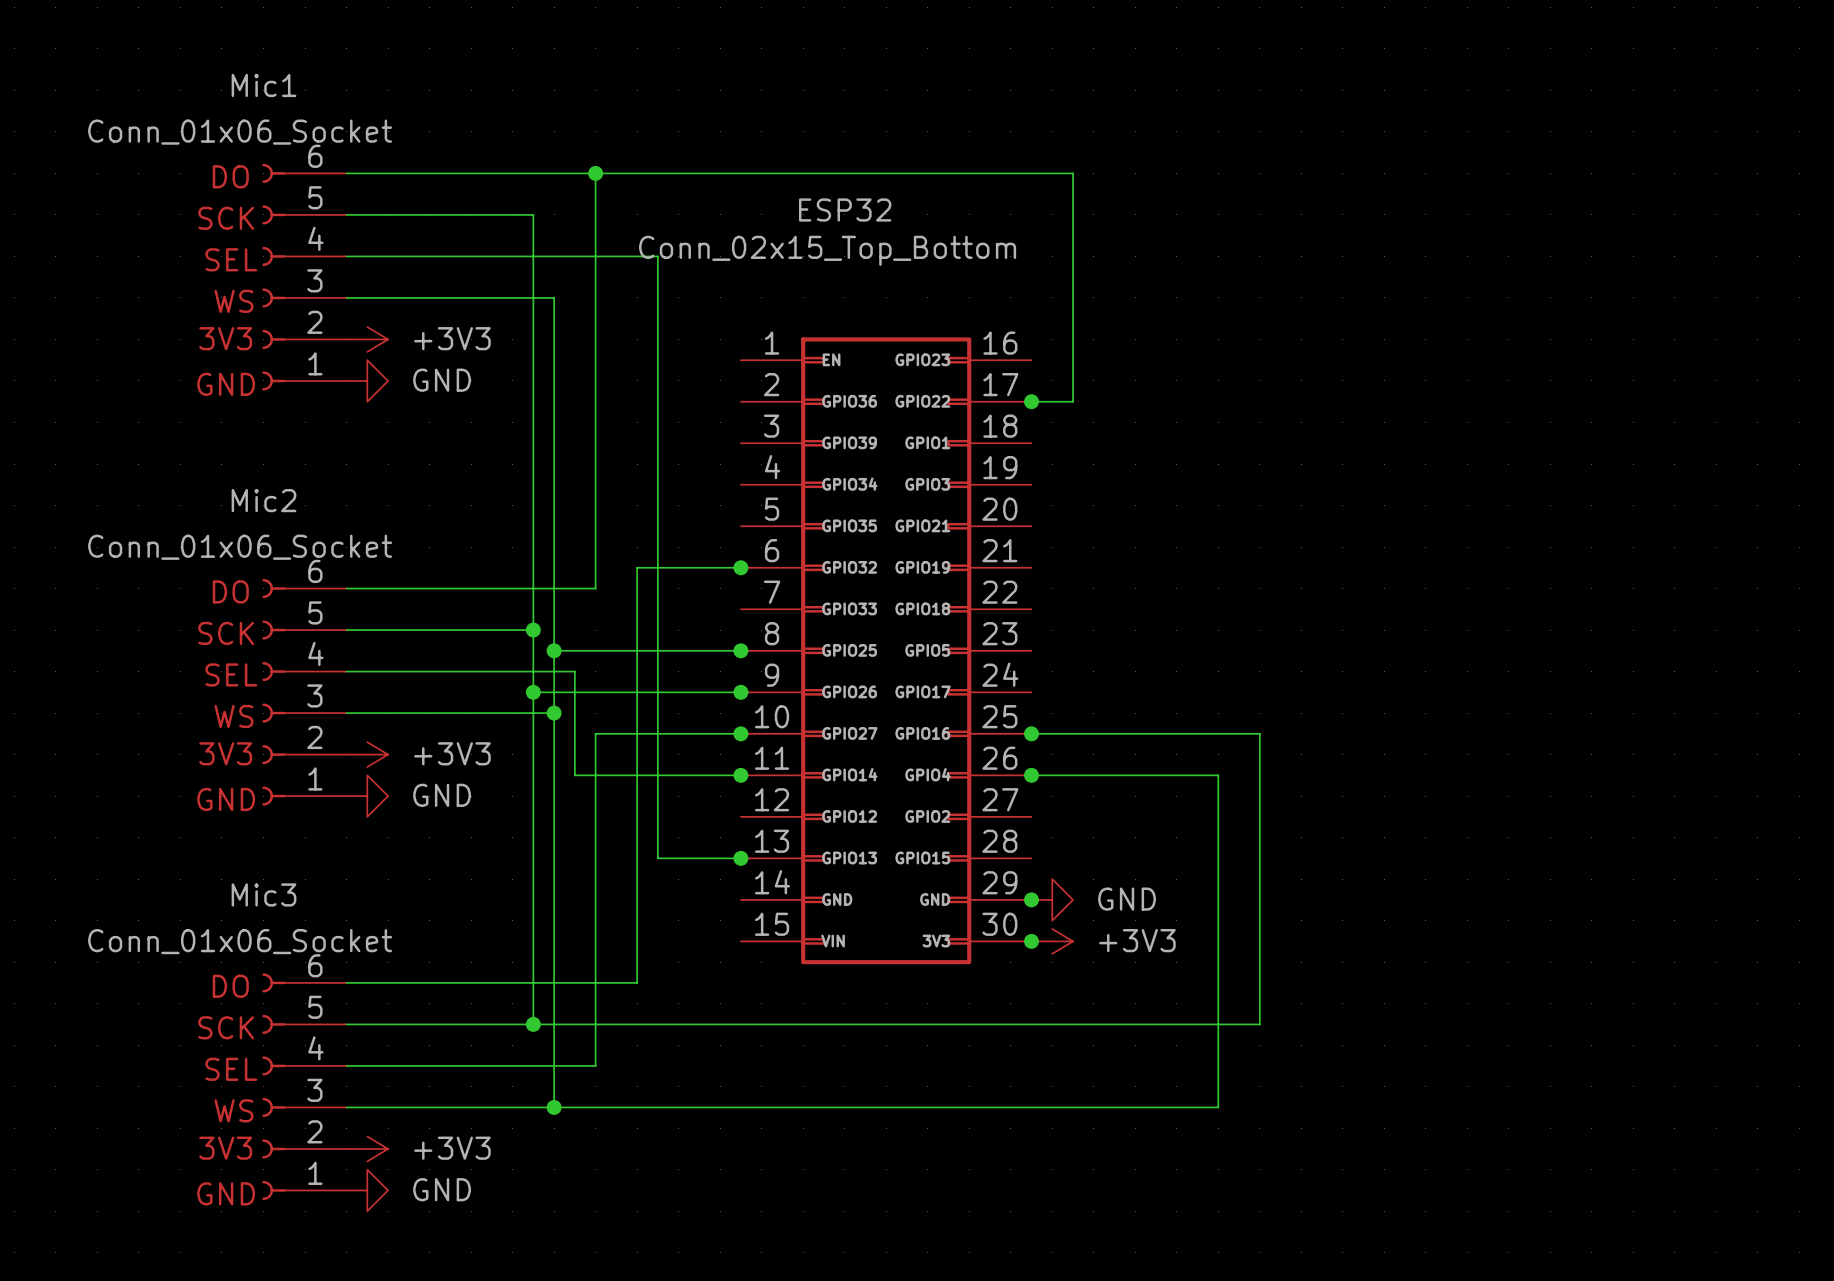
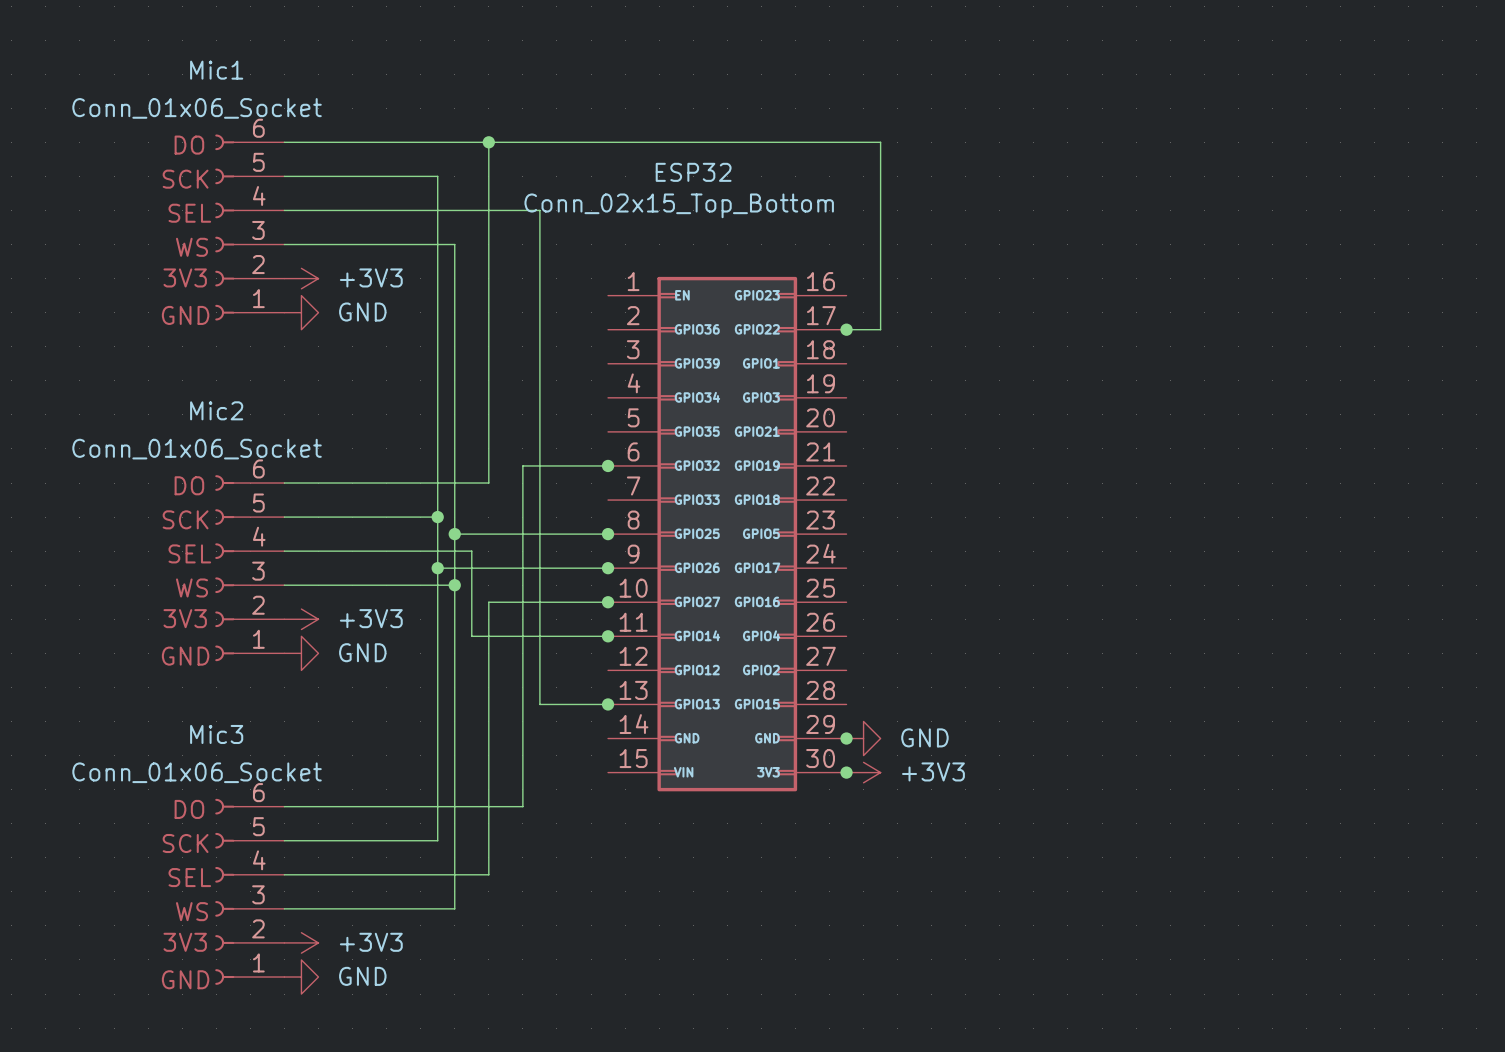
wire: (1031, 733) (1259, 733) (1259, 1024) (533, 1024) -> none
junction: (1031, 733) -> none
wire: (1031, 775) (1218, 775) (1218, 1107) (554, 1107) -> none
junction: (1031, 775) -> none
junction: (533, 1024) -> none
junction: (554, 1107) -> none

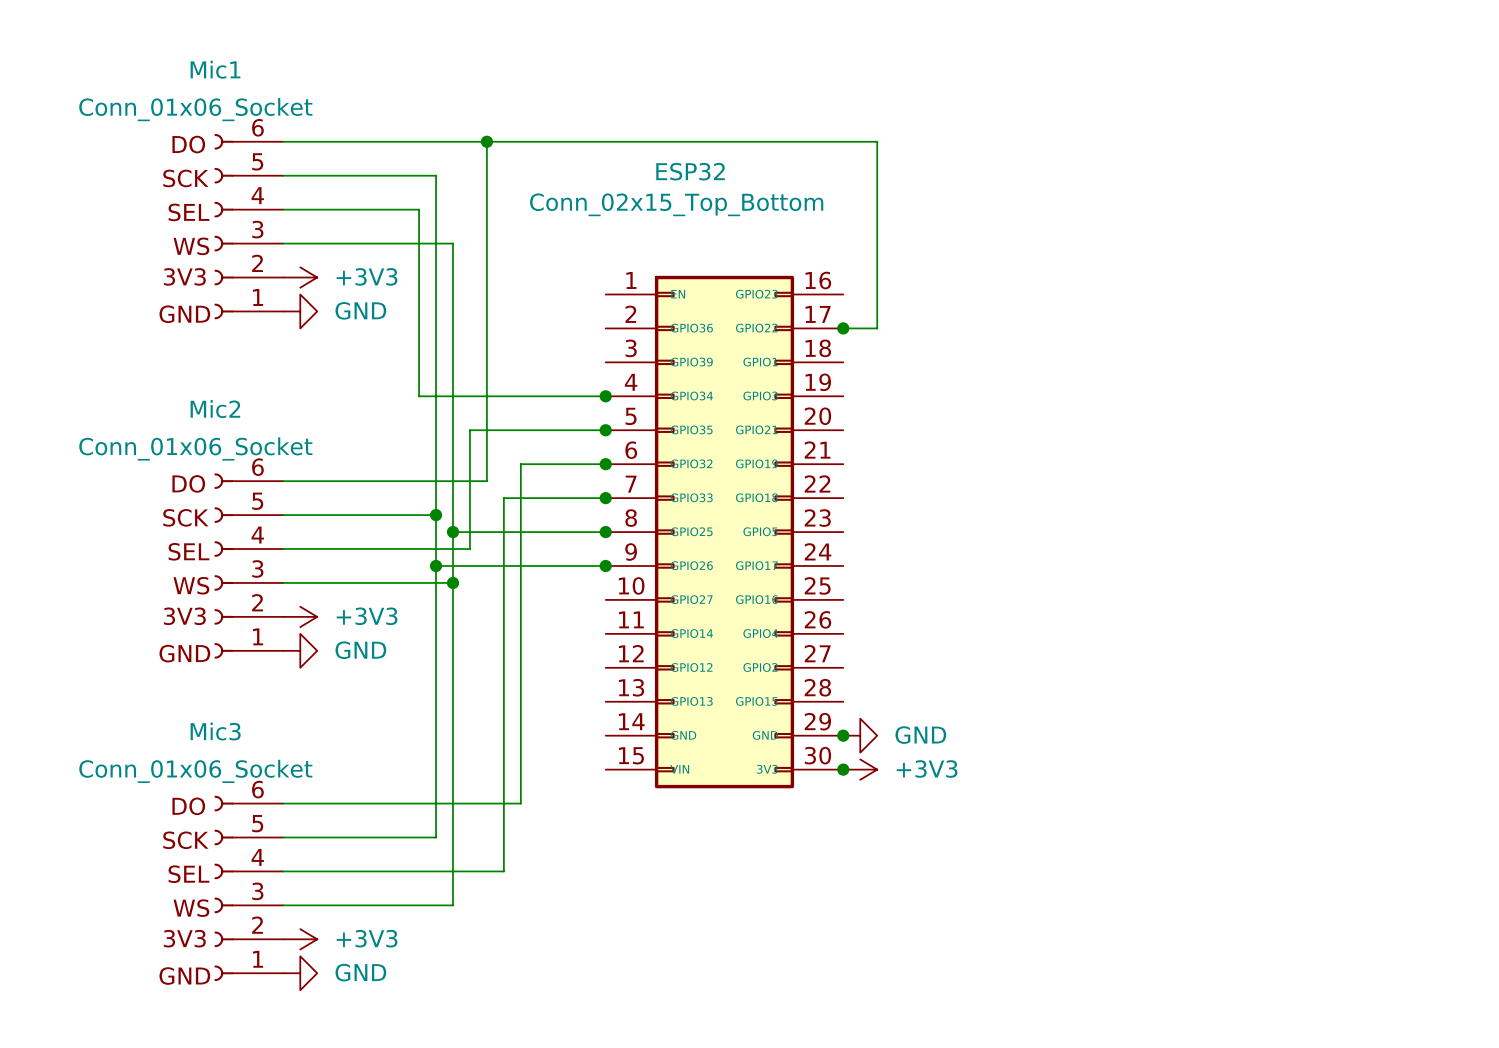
wire: (420, 210) (539, 210) (539, 704) (608, 704) -> (419, 209) (419, 396) (605, 396)
junction: none -> (605, 396)
junction: none -> (605, 430)
junction: none -> (605, 498)
wire: (471, 551) (471, 636) (608, 636) -> (469, 549) (469, 430) (605, 430)
wire: (608, 602) (488, 602) (488, 874) -> (605, 498) (503, 498) (503, 871) (486, 871)
junction: (608, 602) -> none
junction: (608, 636) -> none
junction: (608, 704) -> none

